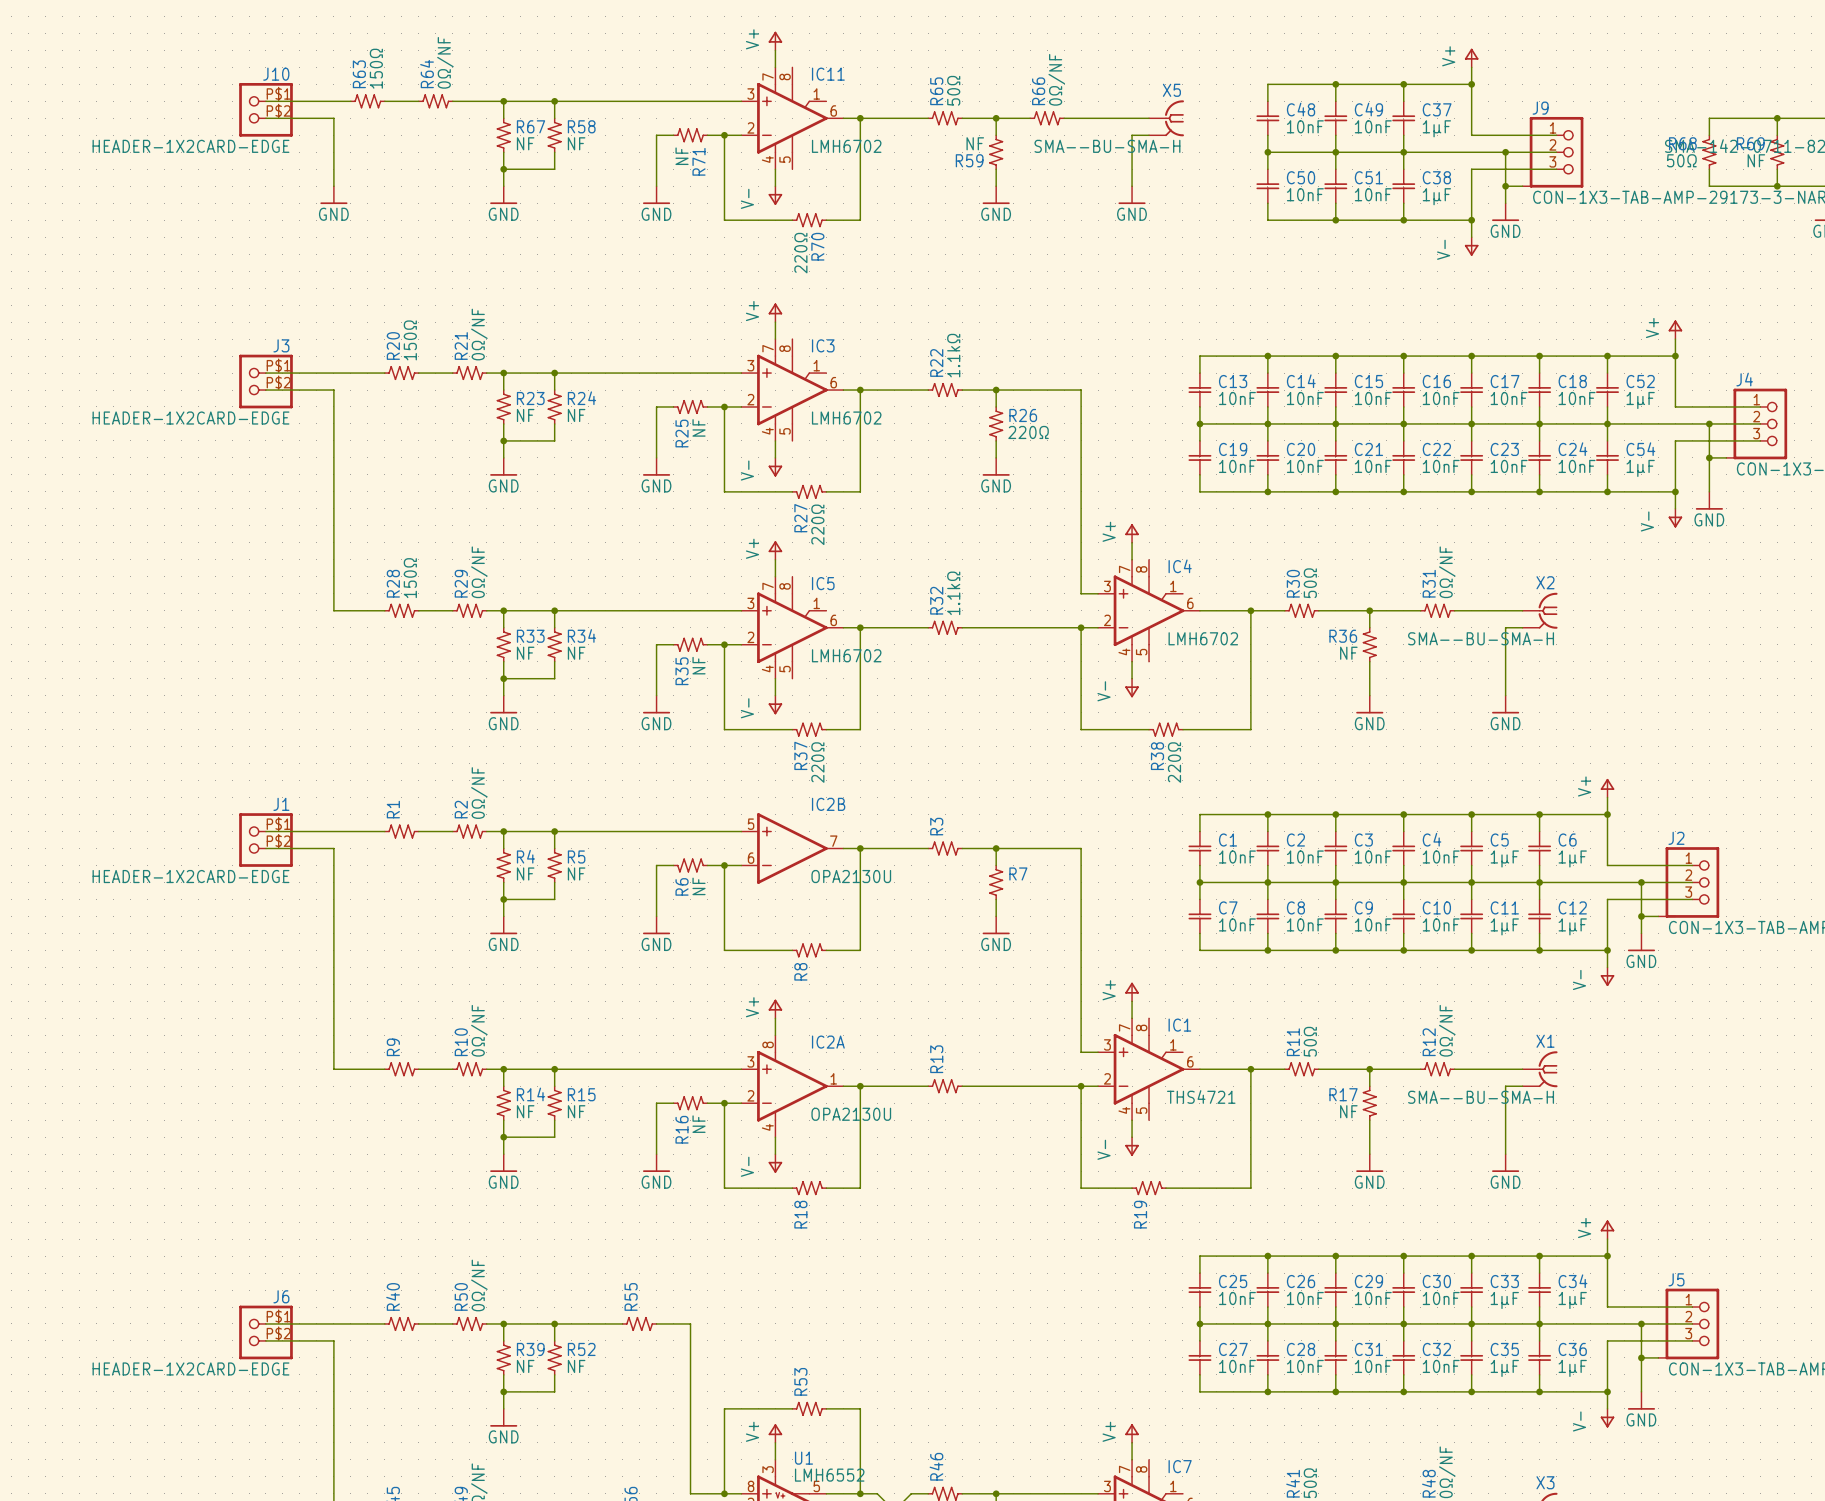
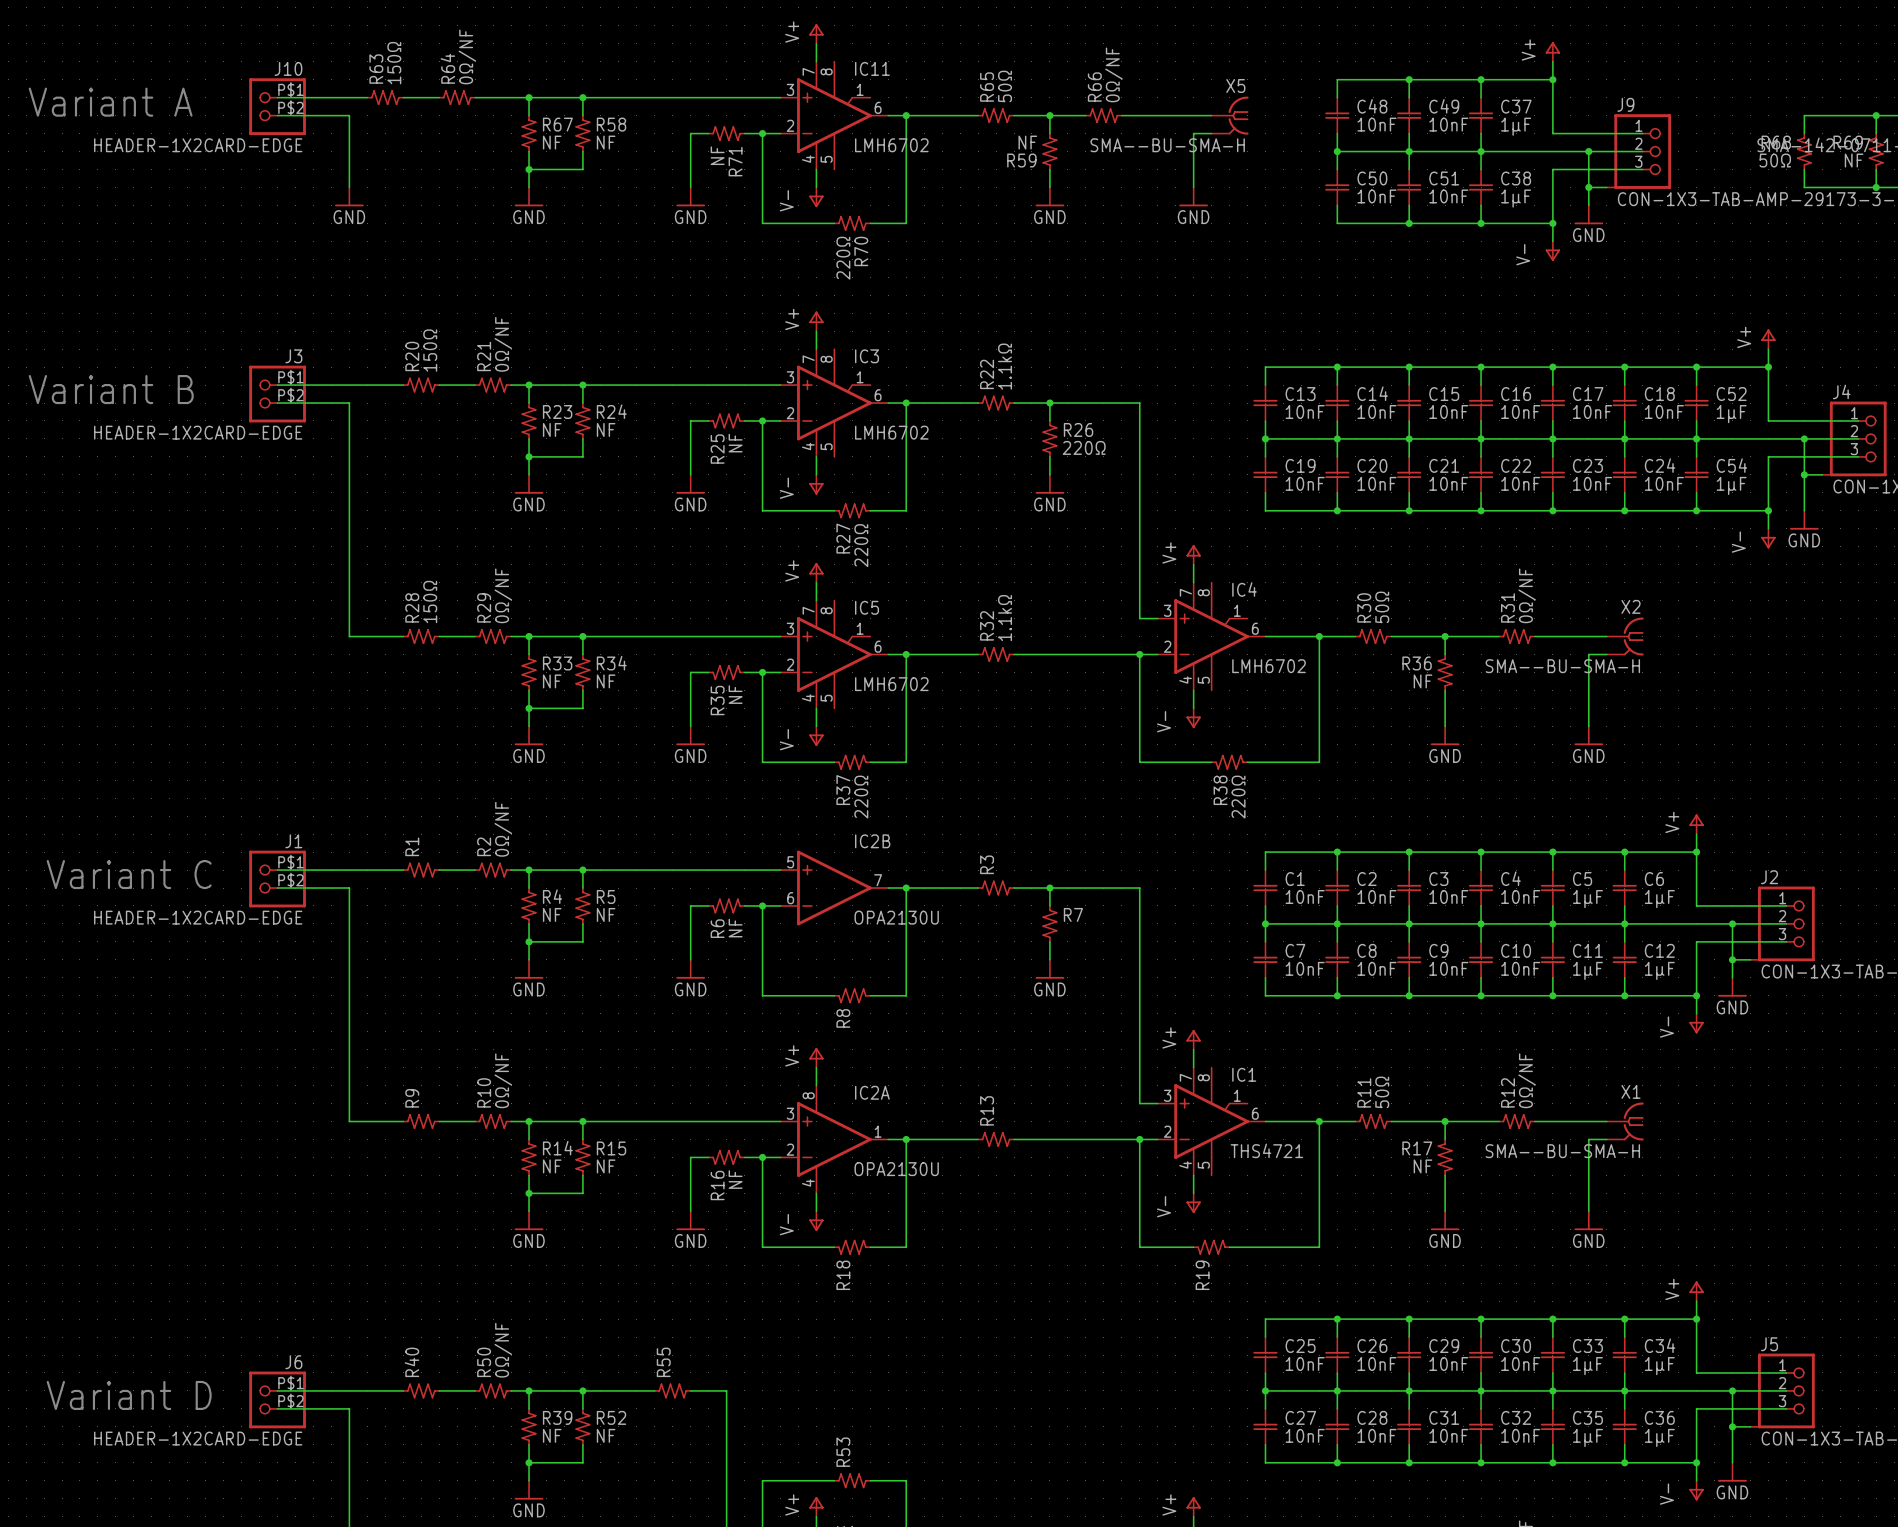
text: none -> Variant A (110, 102)
text: none -> Variant B (111, 389)
text: none -> Variant C (129, 874)
text: none -> Variant D (129, 1395)

